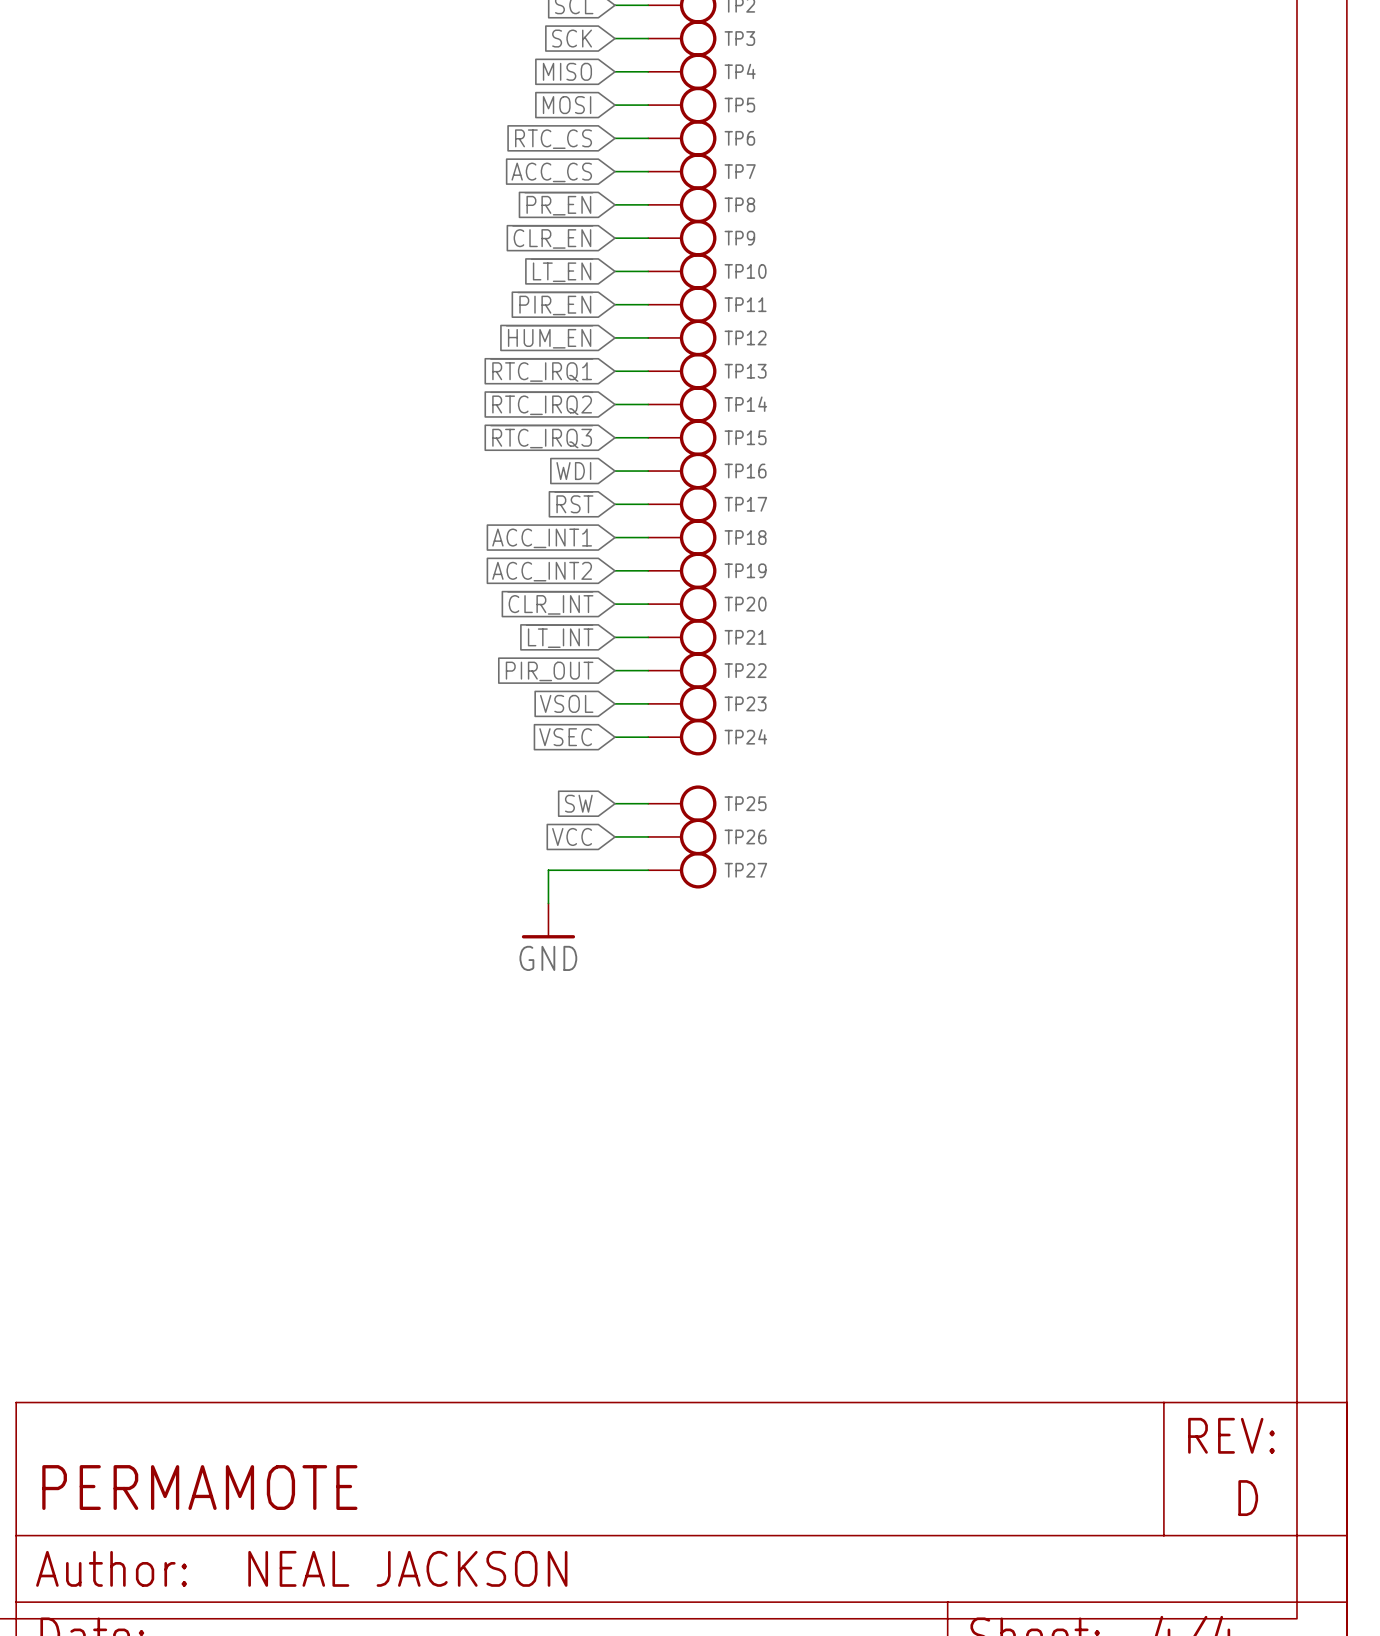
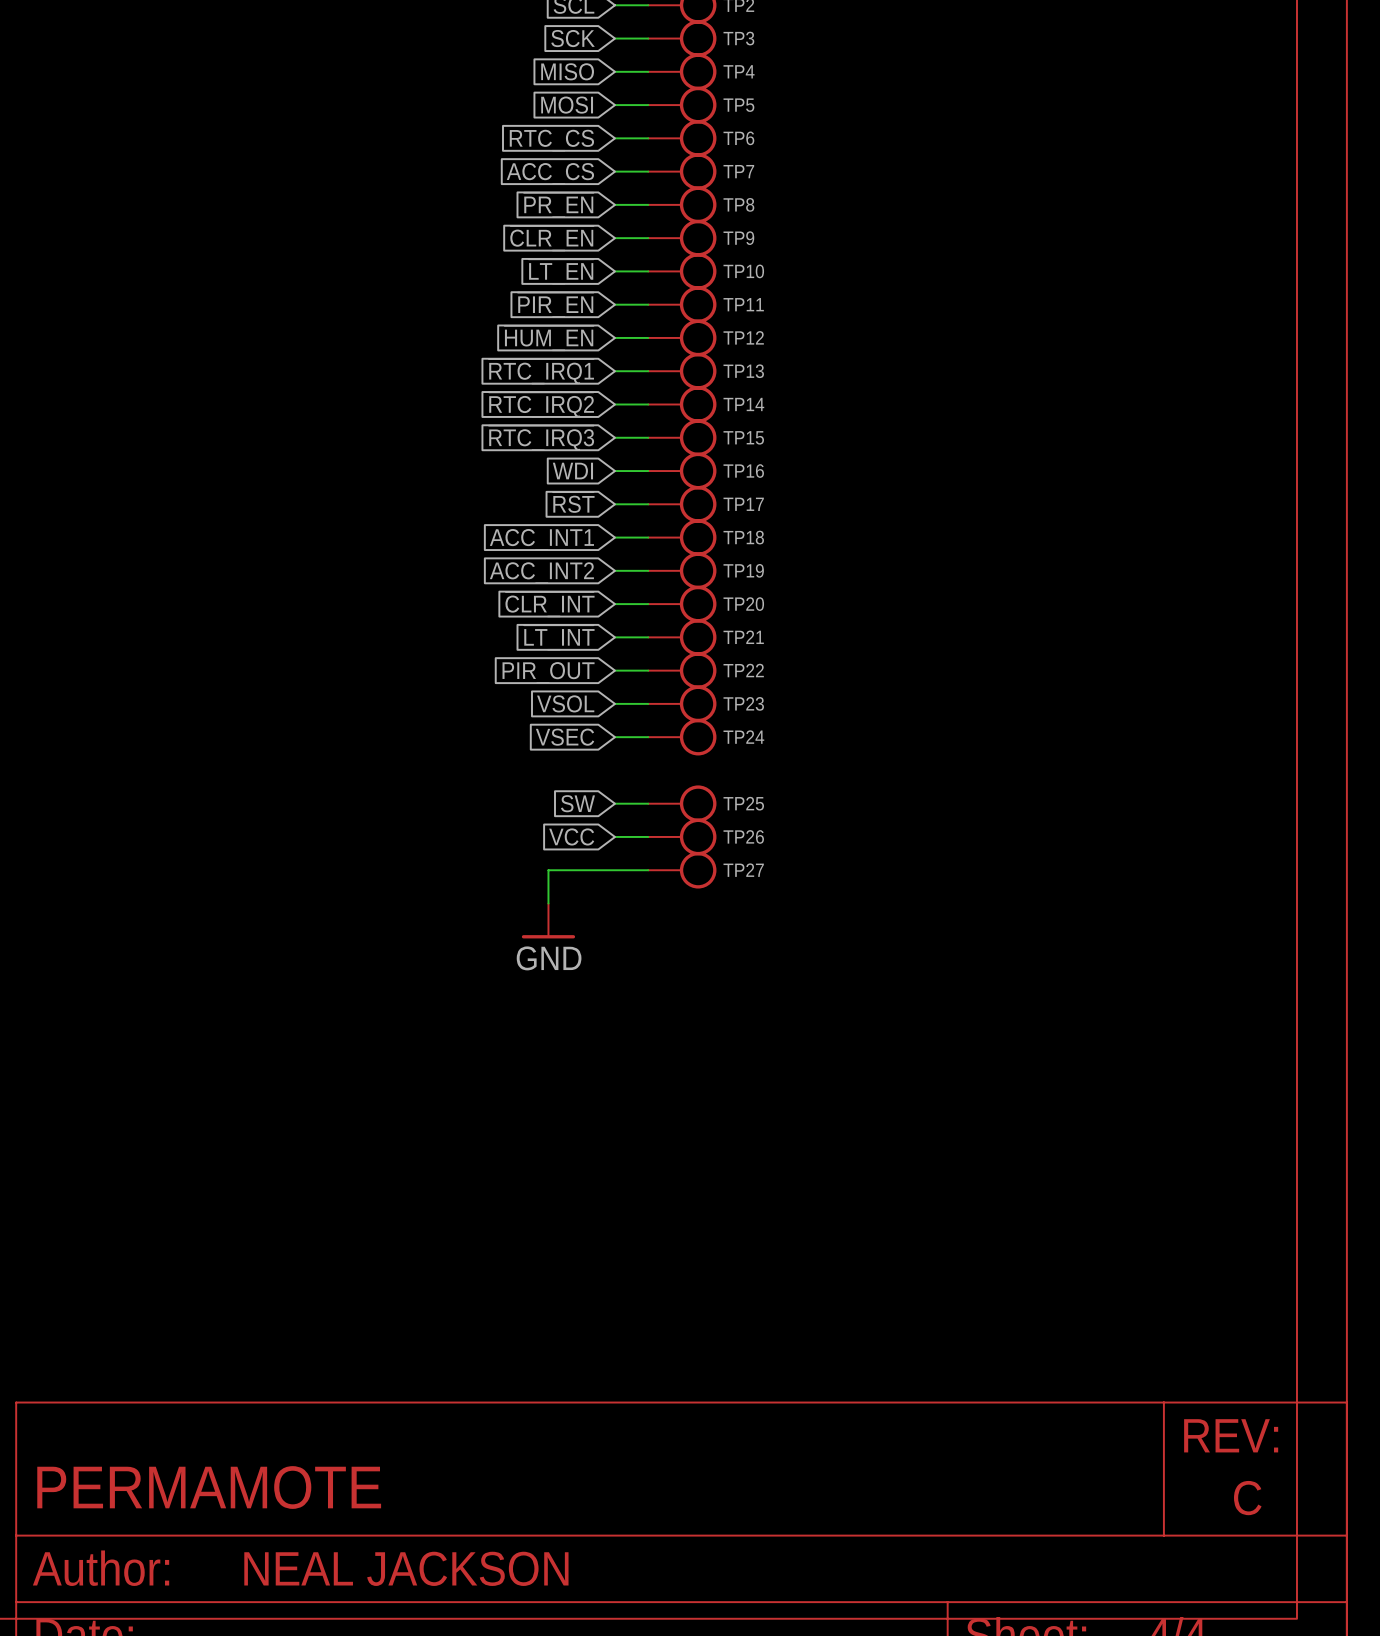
part text: D (1248, 1498) -> C (1247, 1498)

